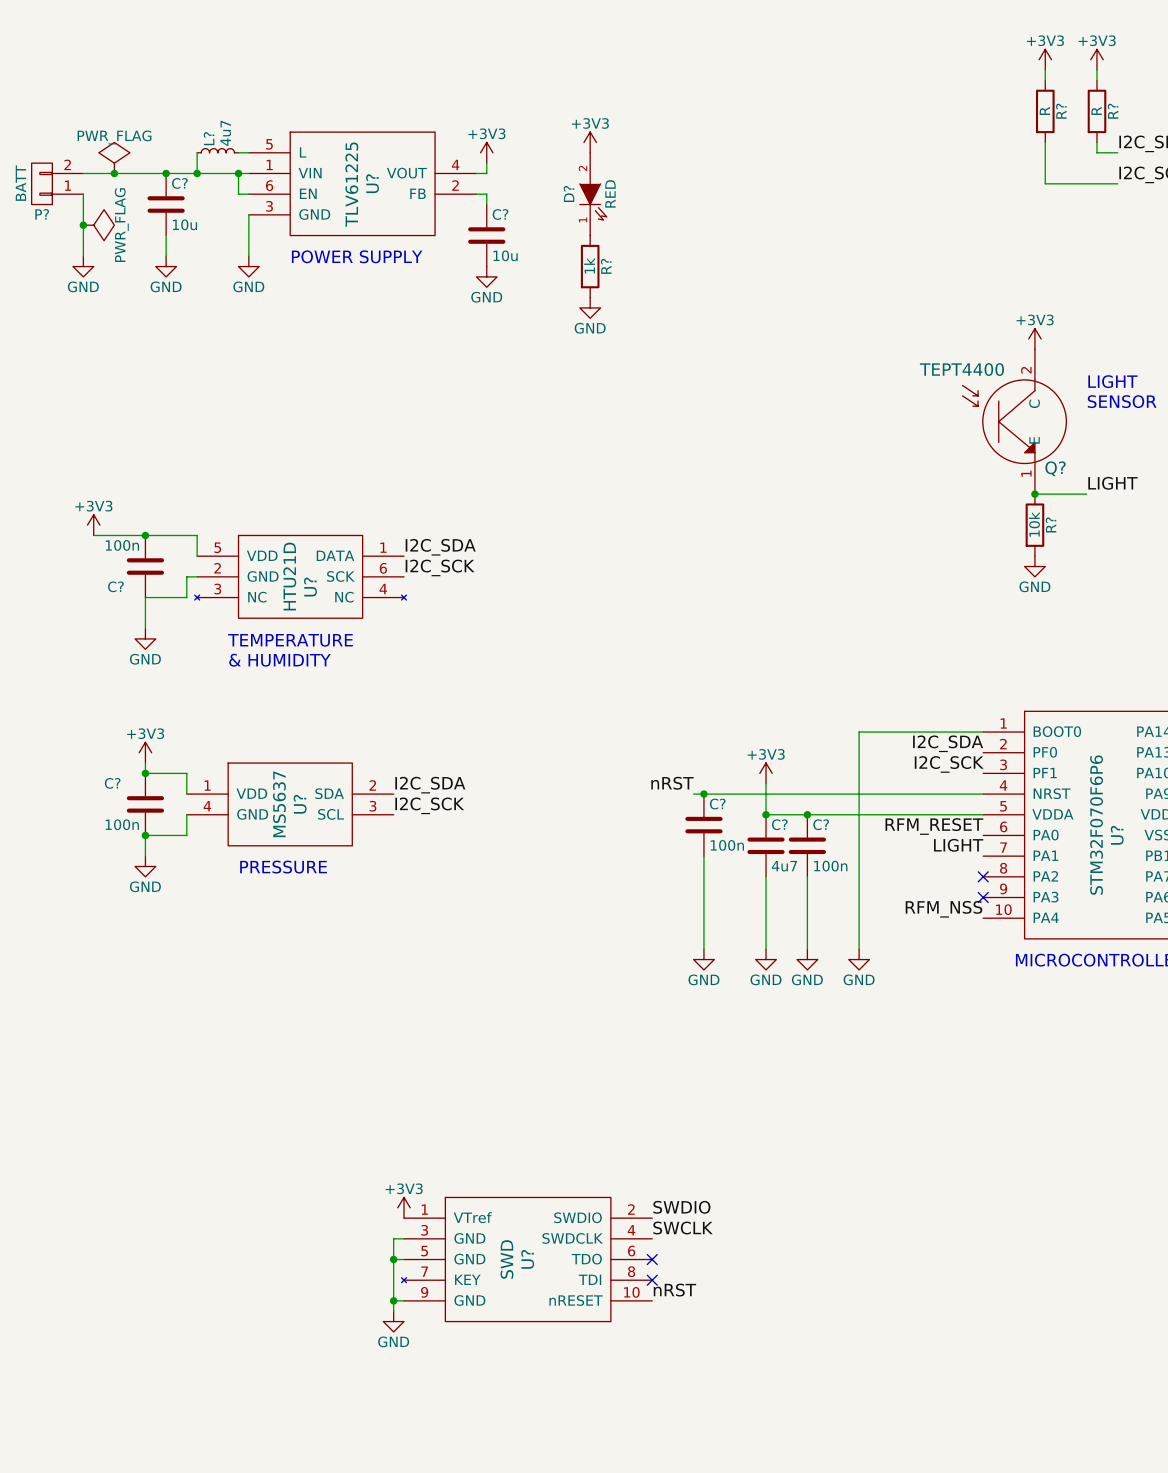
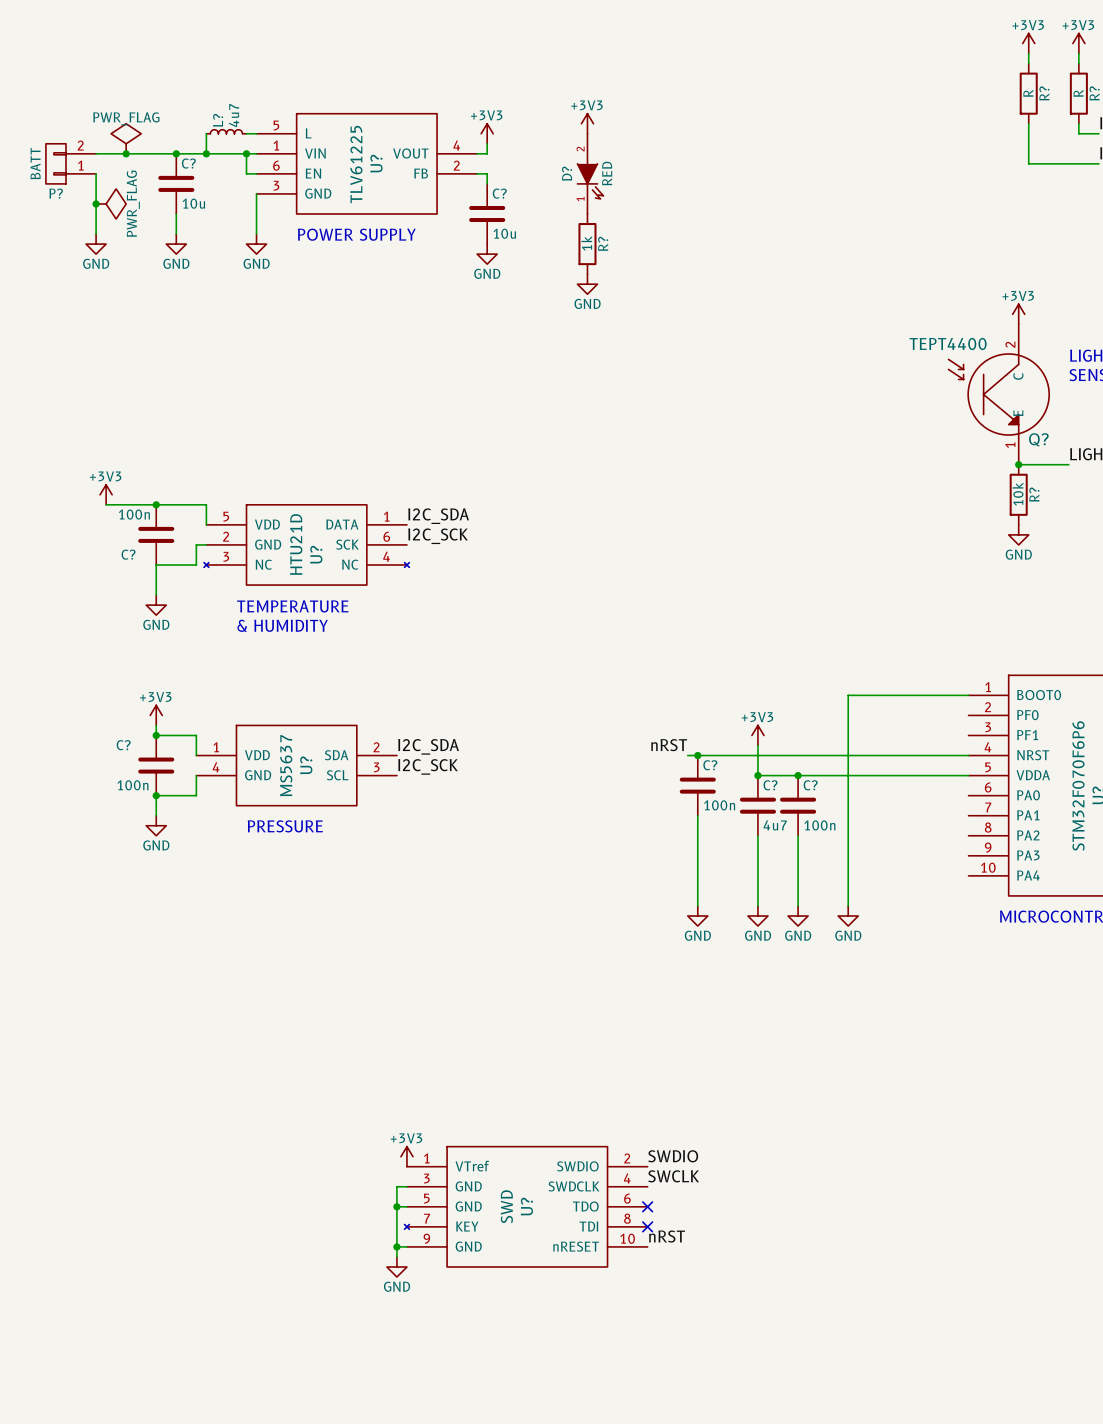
label: I2C_SDA (948, 743) -> none
label: I2C_SCK (949, 764) -> none
label: RFM_RESET (934, 826) -> none
label: LIGHT (958, 845) -> none
no-connect mark: (983, 876) -> none
no-connect mark: (983, 897) -> none
label: RFM_NSS (944, 909) -> none

